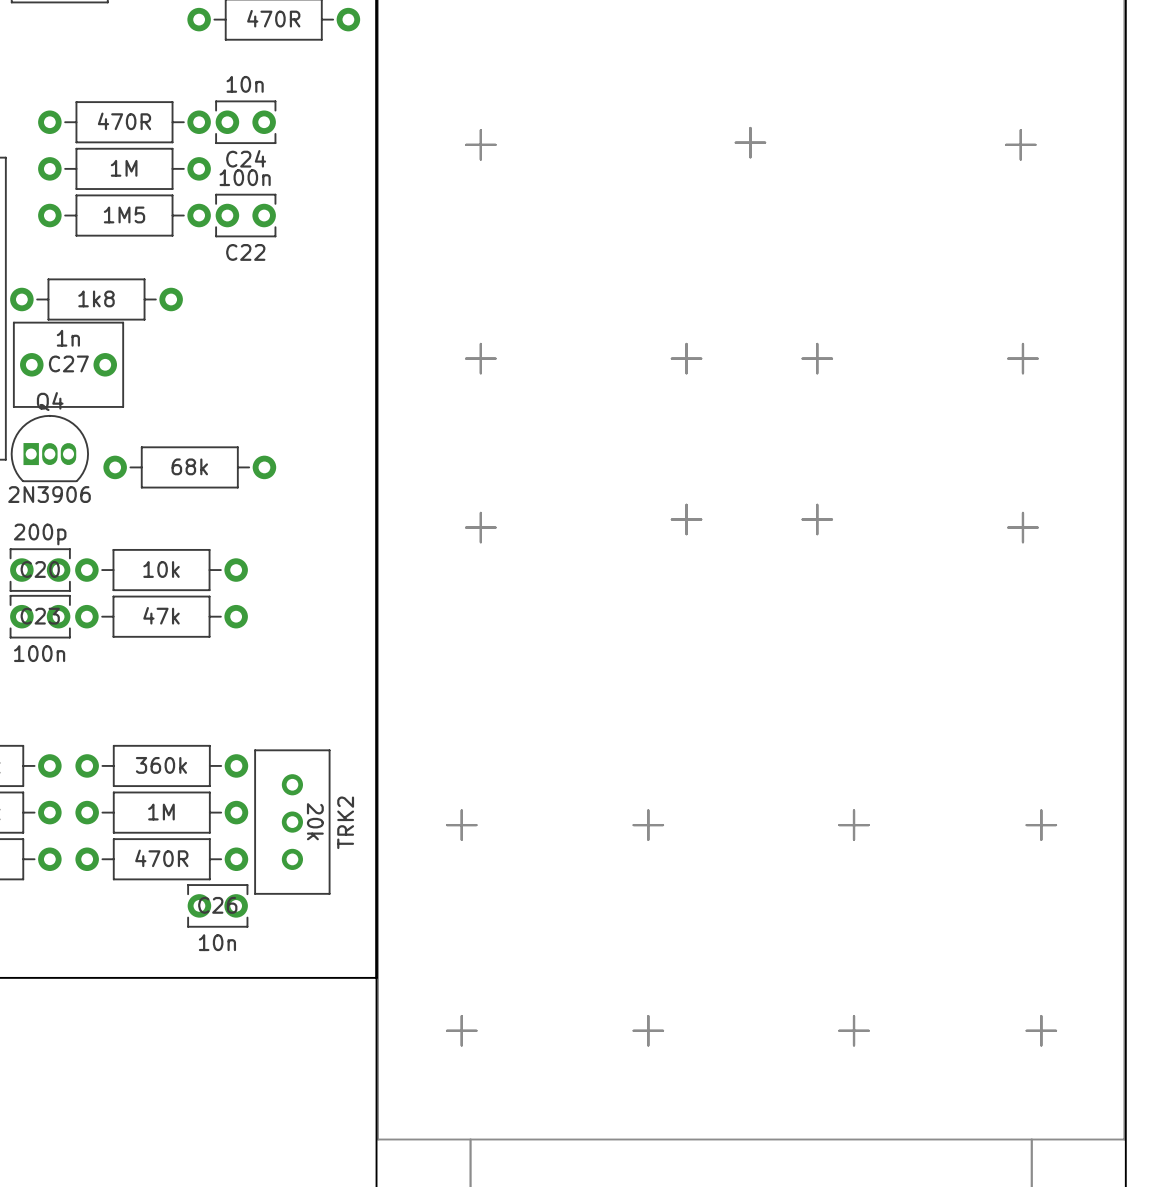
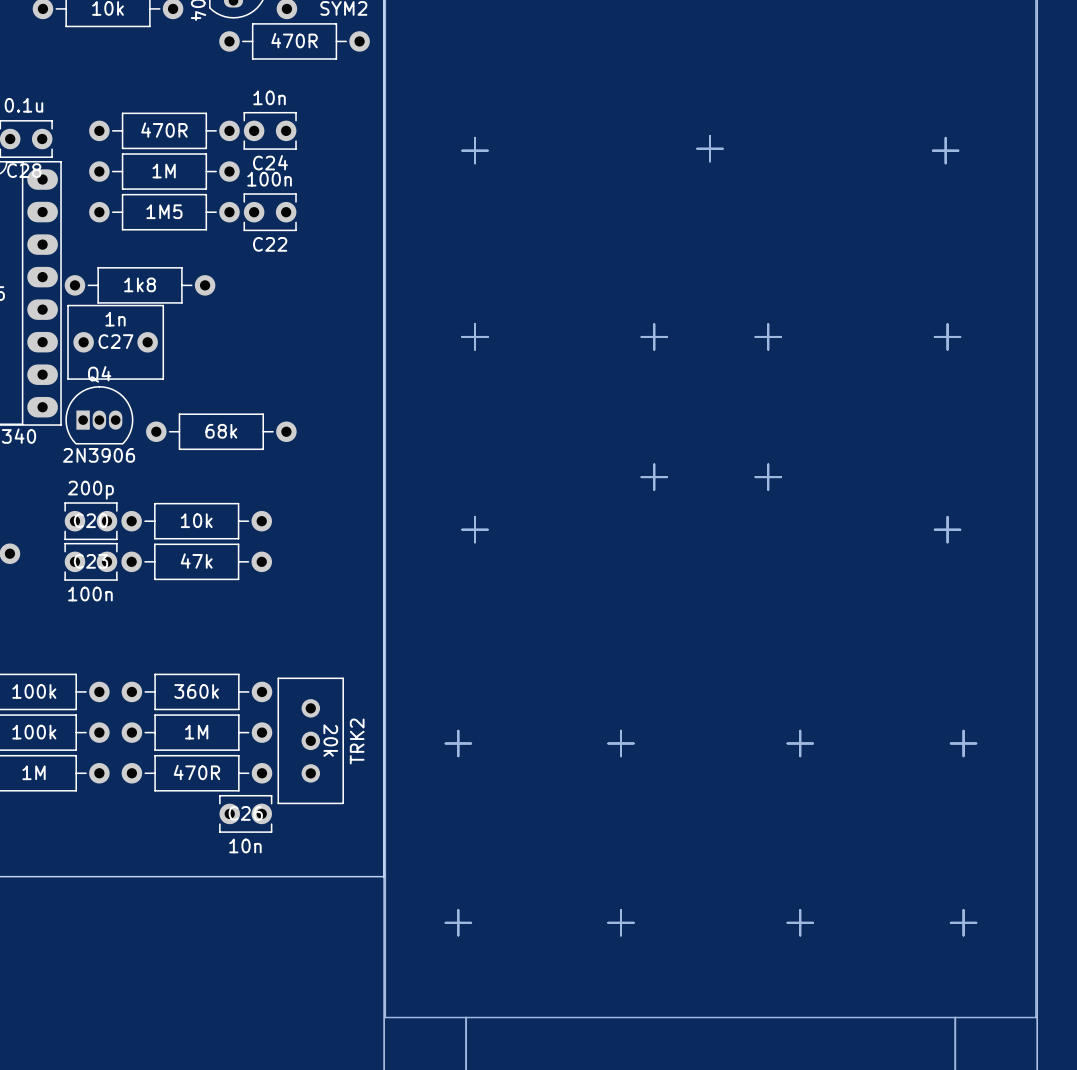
line: (480, 512) (480, 542) -> (475, 516) (475, 542)
line: (1022, 512) (1022, 542) -> (947, 516) (947, 542)
line: (466, 527) (495, 527) -> (462, 529) (487, 529)
line: (1008, 527) (1037, 527) -> (934, 529) (960, 529)

